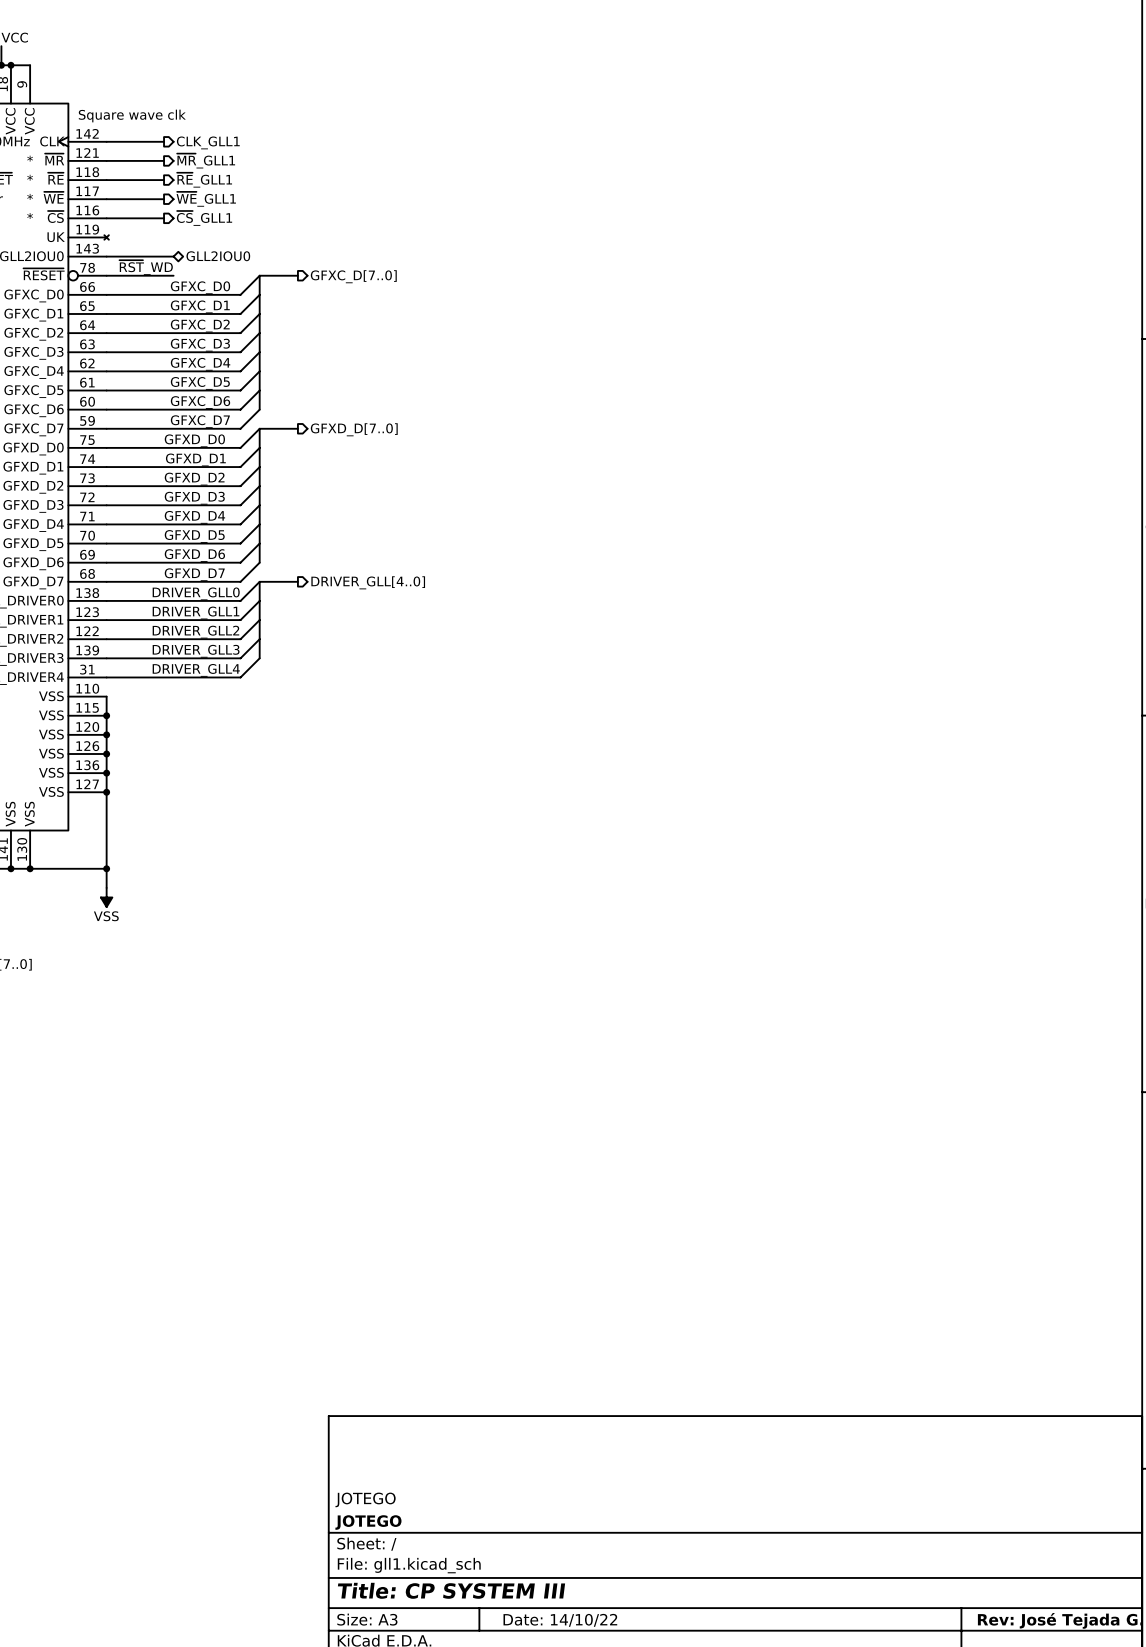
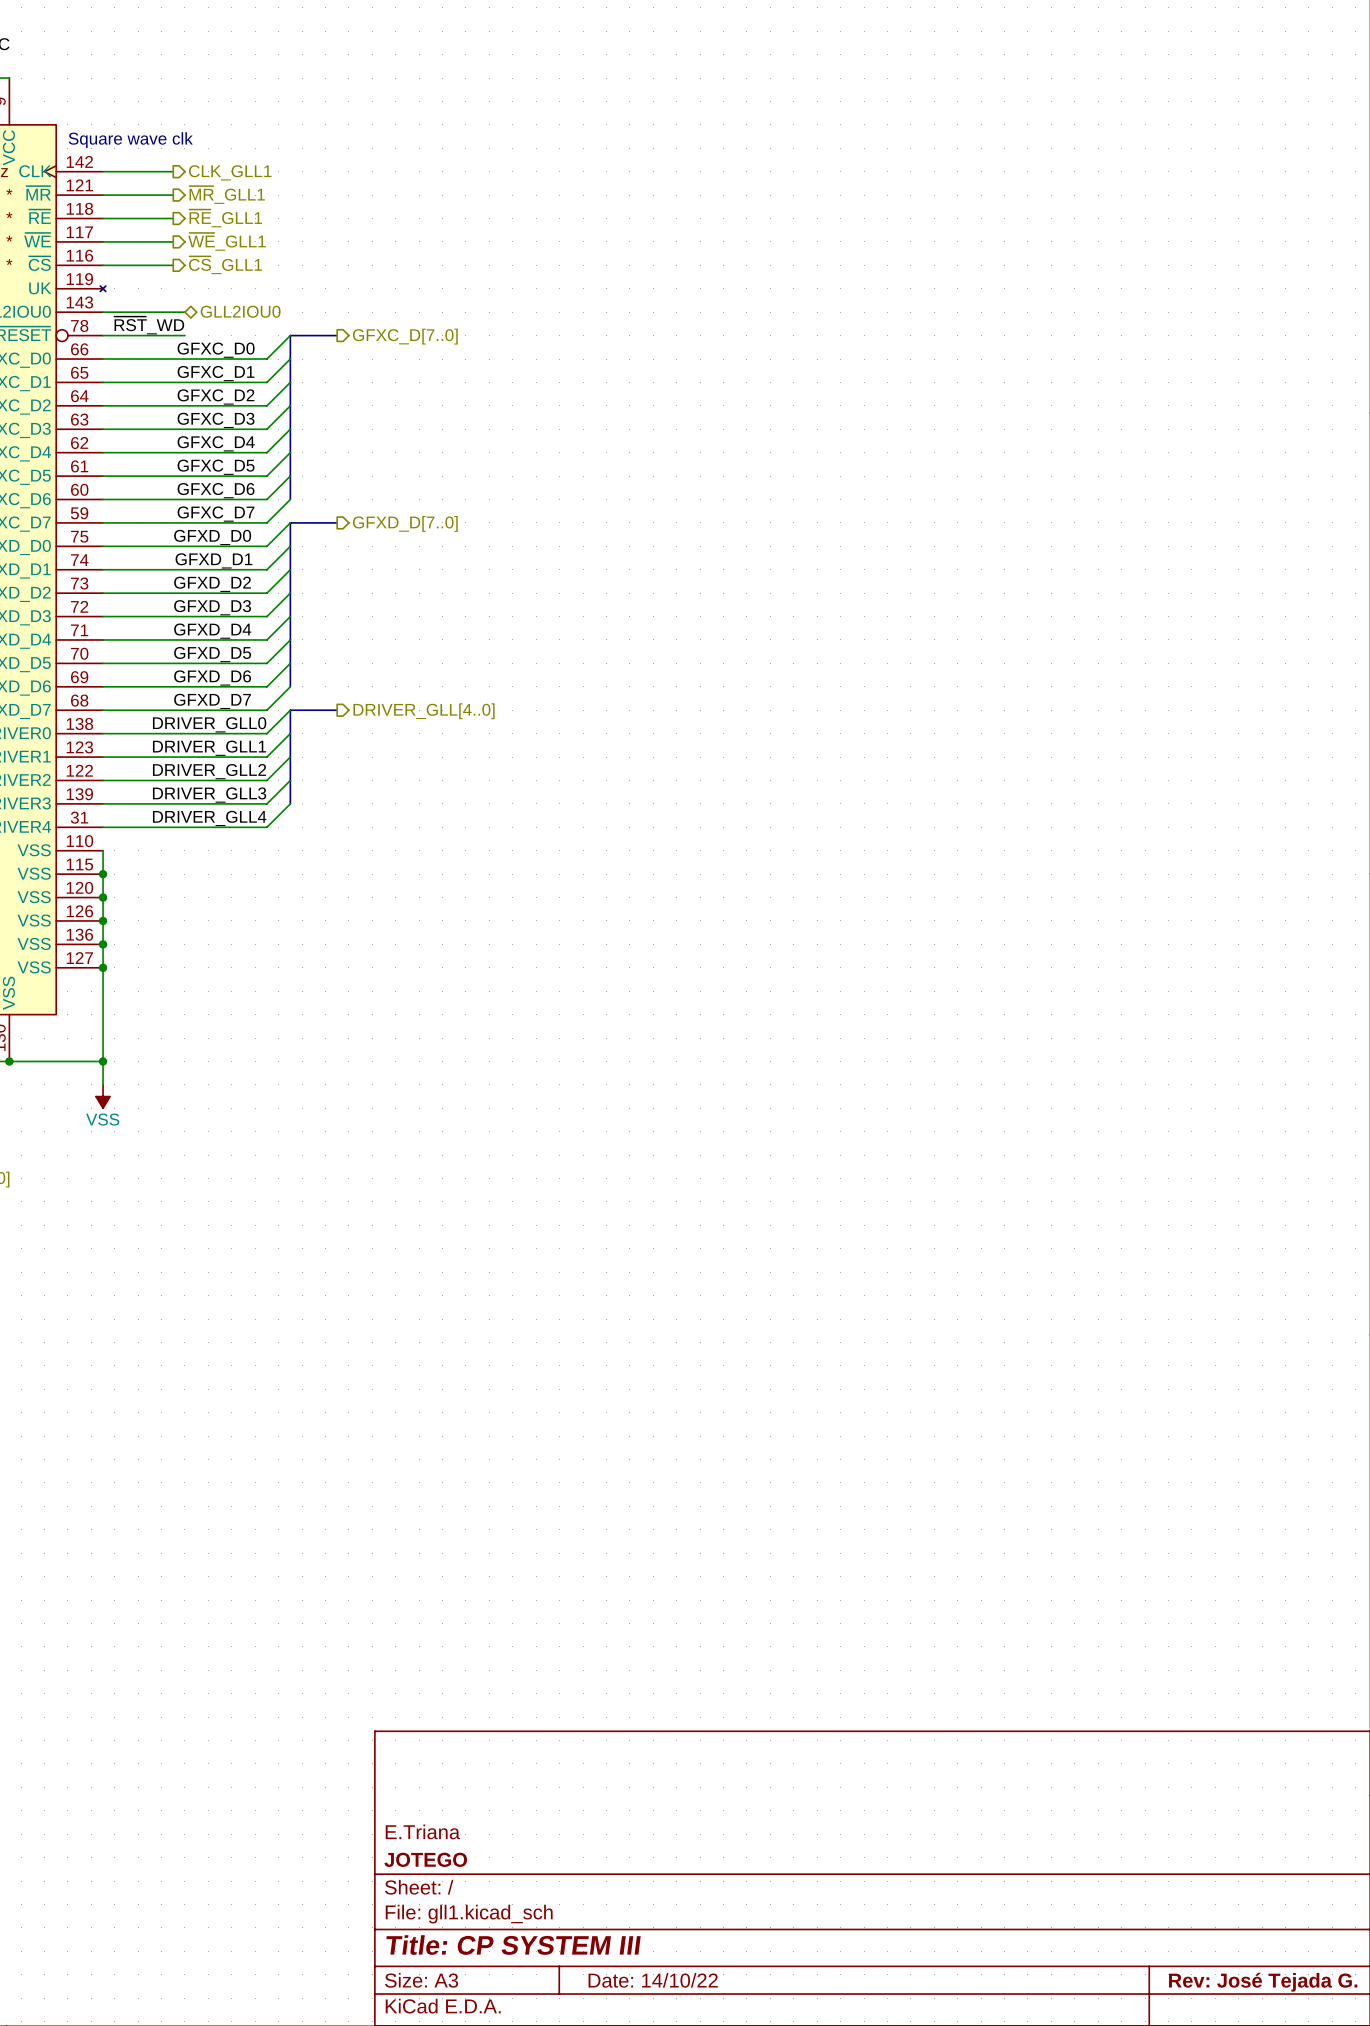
title block: JOTEGO (365, 1499) -> E.Triana (422, 1831)

